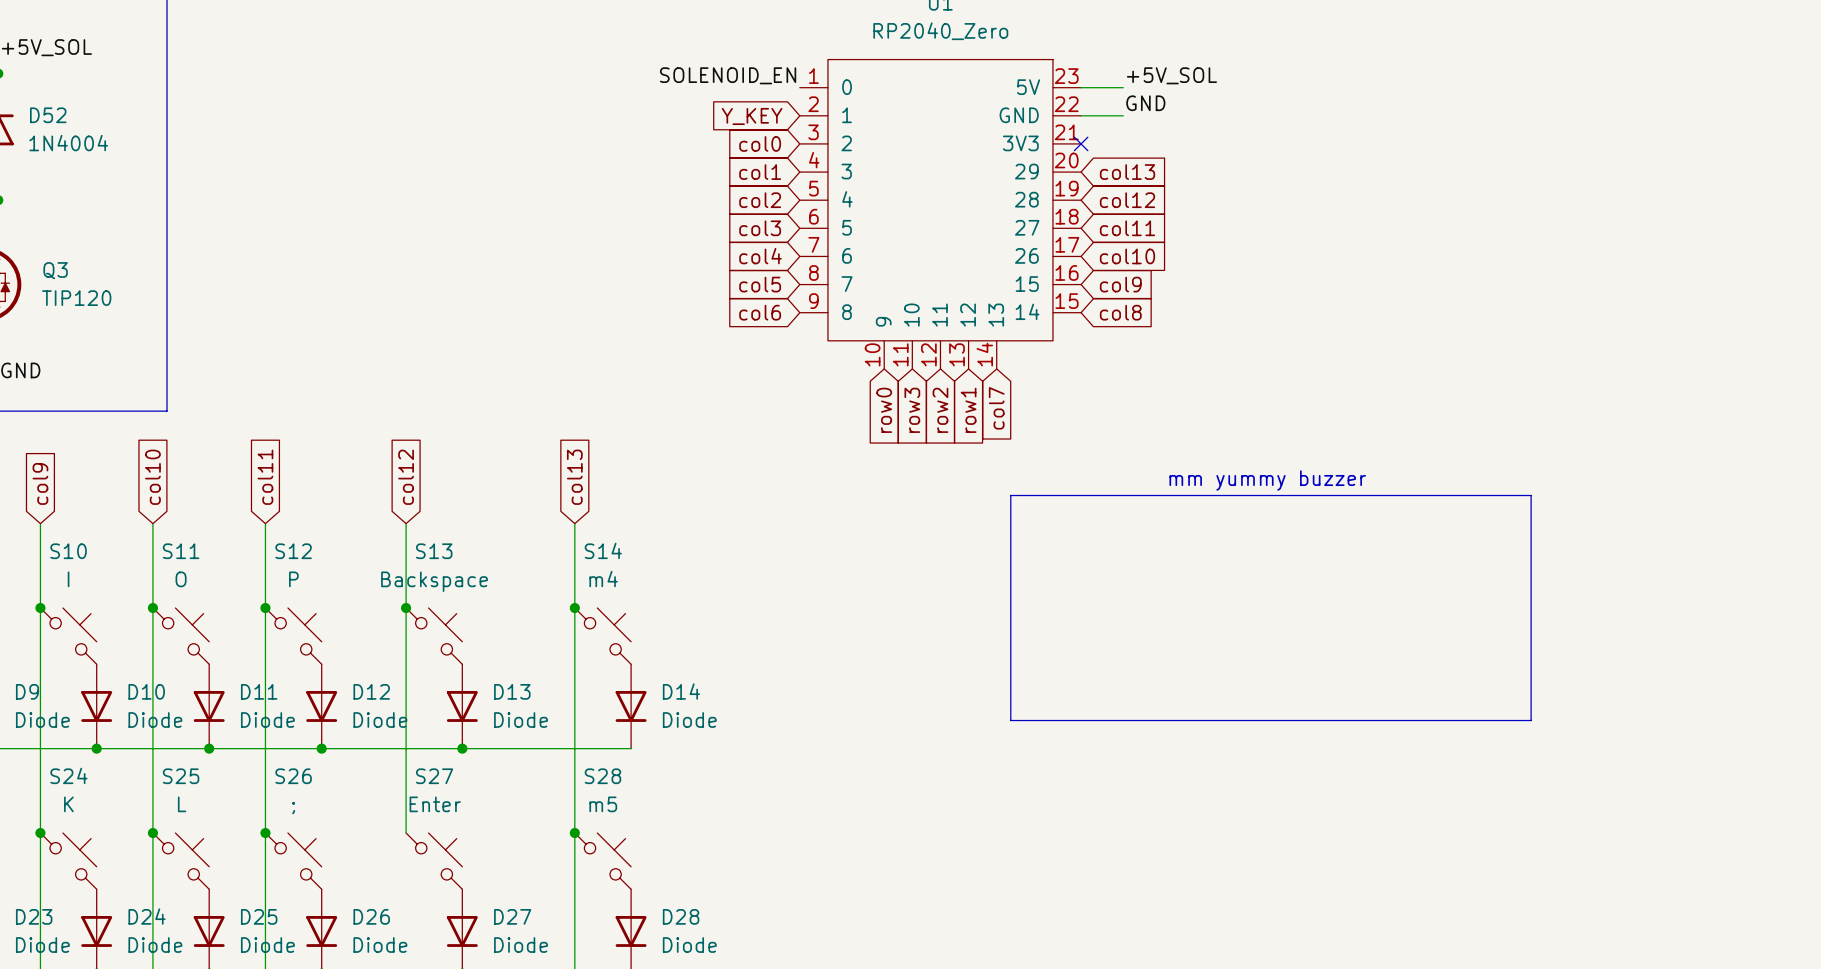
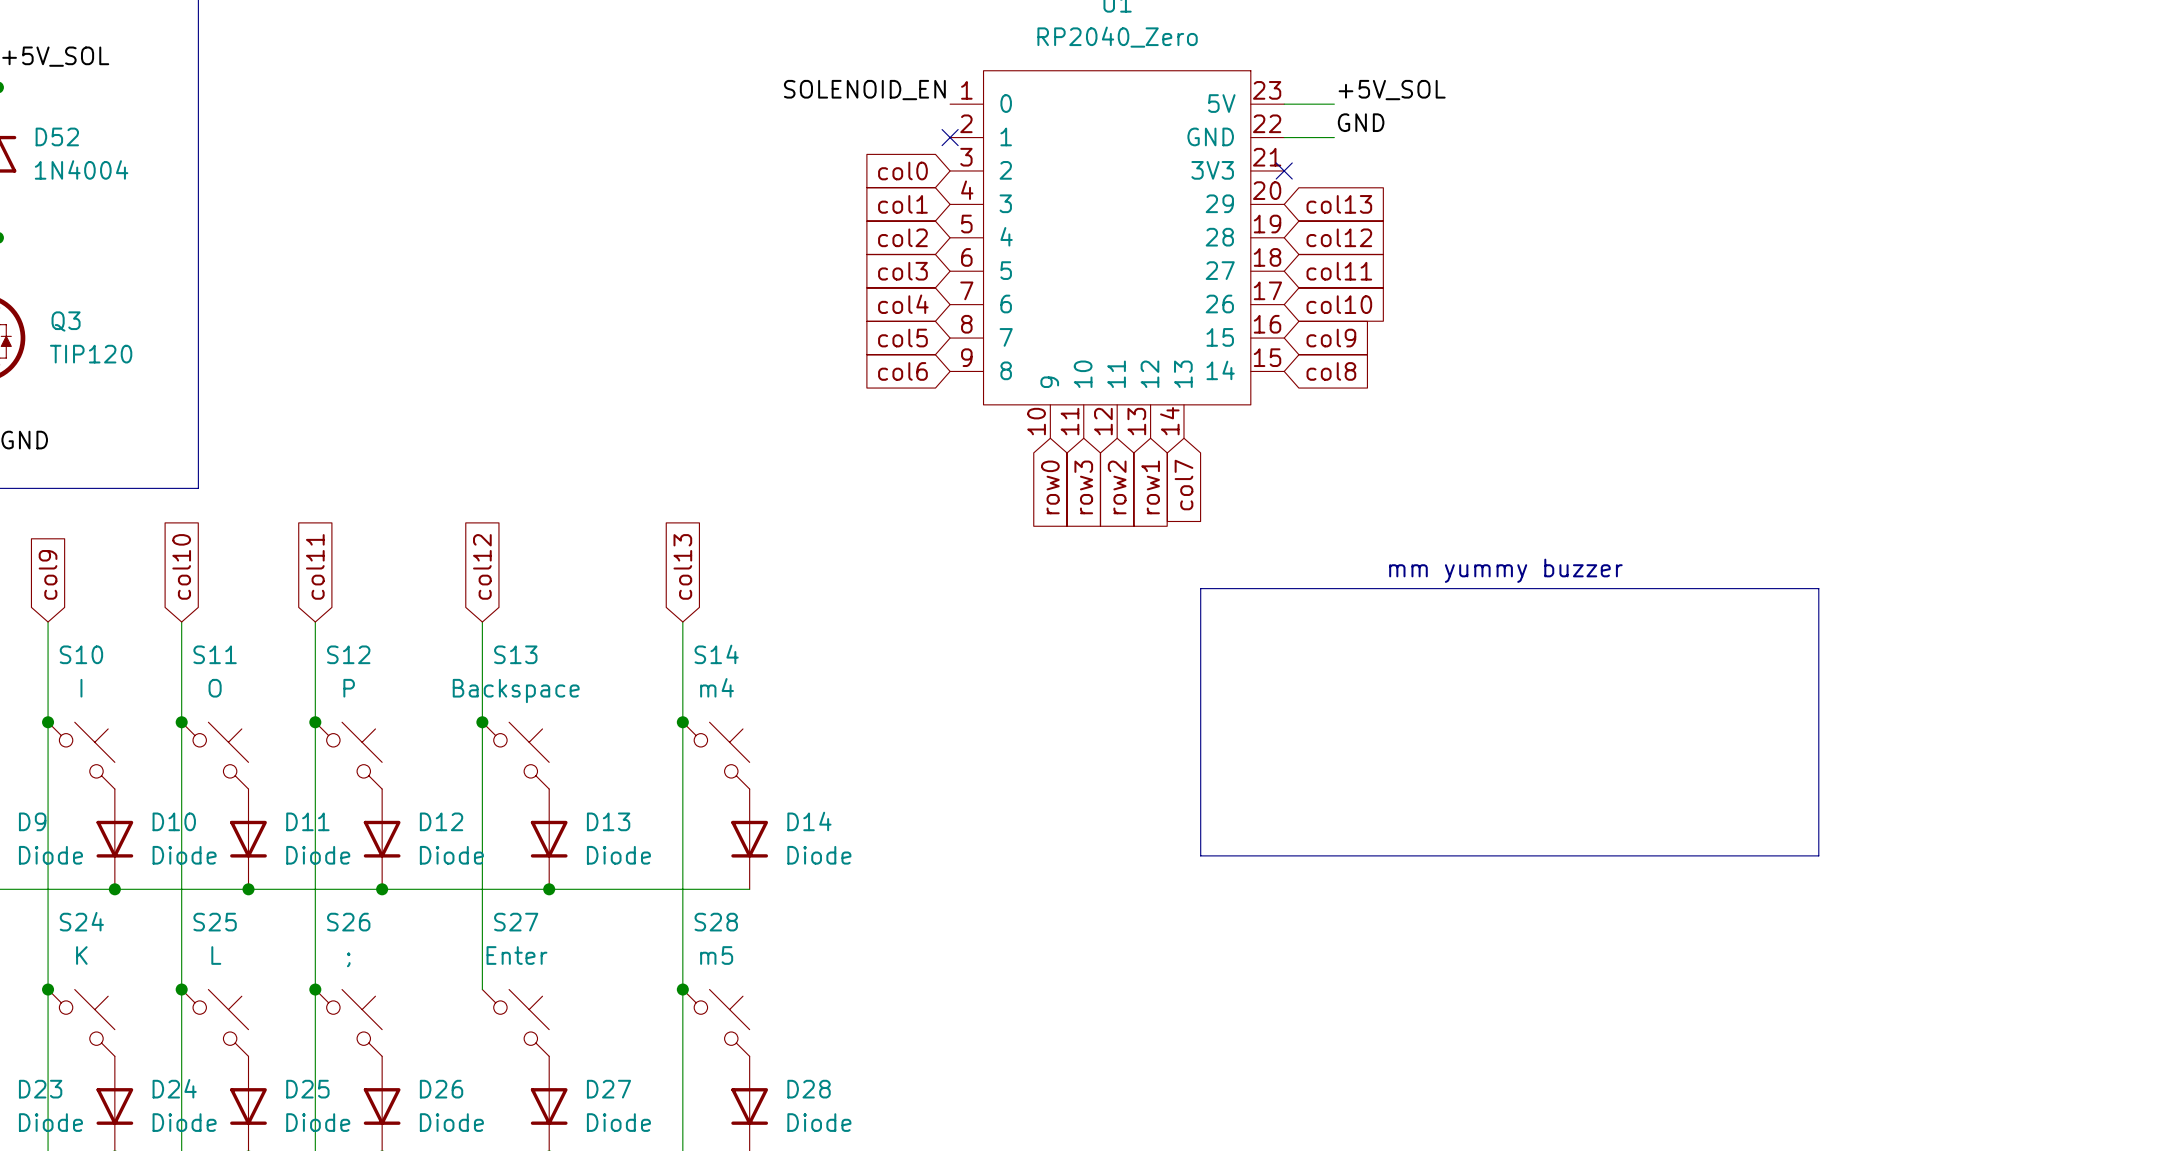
no-connect mark: none -> (950, 137)
global label: Y_KEY (752, 116) -> none

